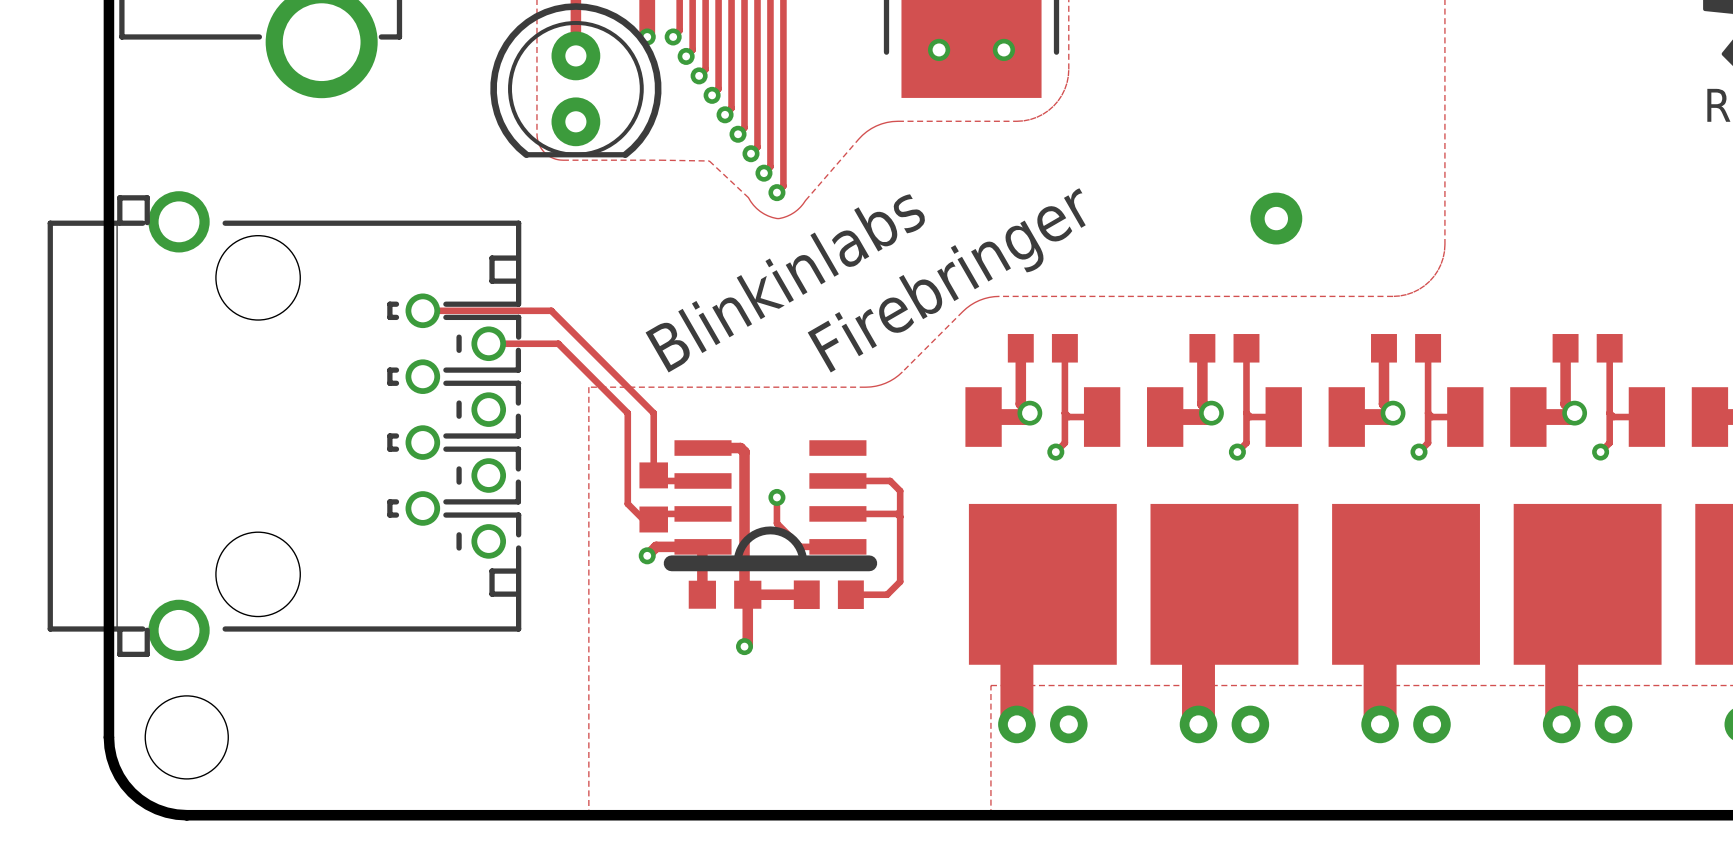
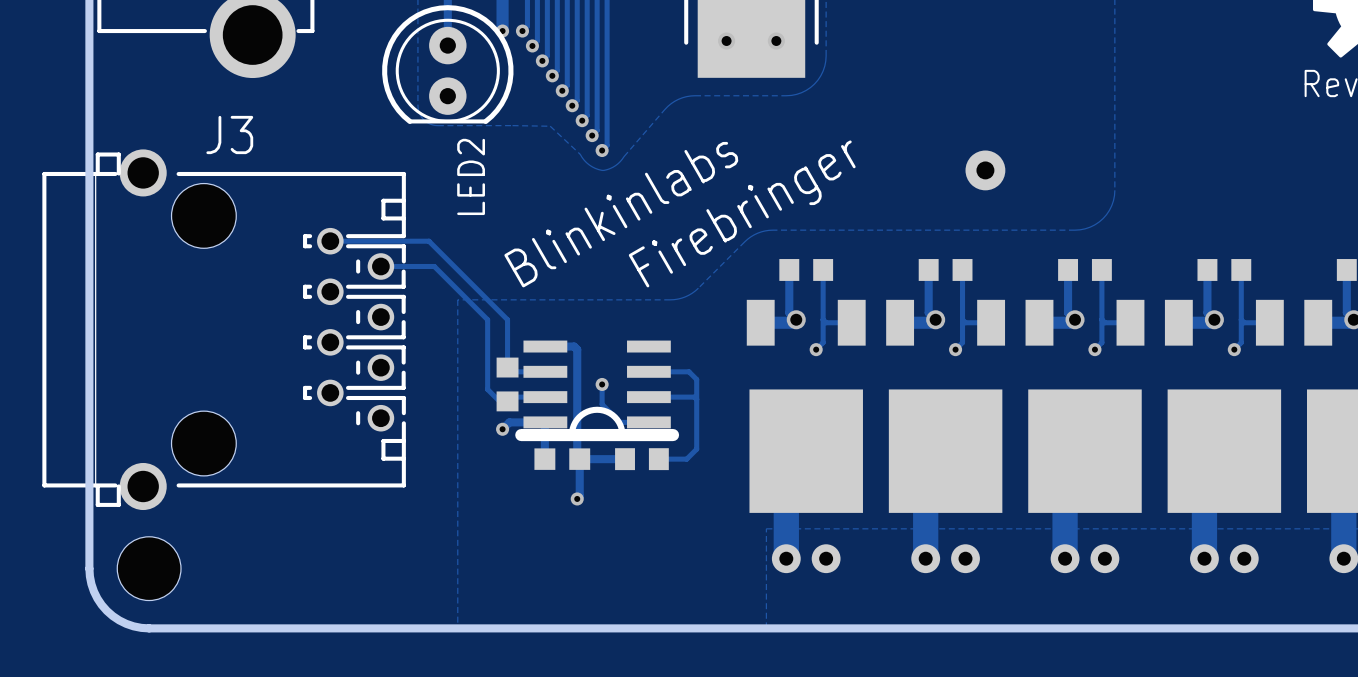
J3 name: none -> J3 (229, 135)
LED2 name: none -> LED2 (471, 176)

